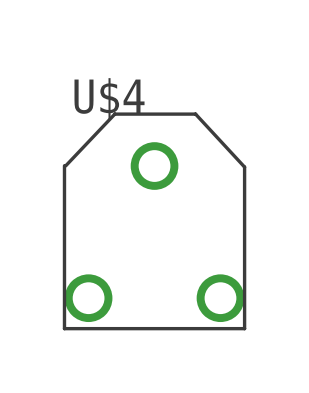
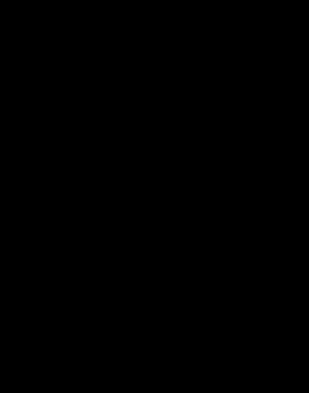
U$4: (154, 221) -> none

